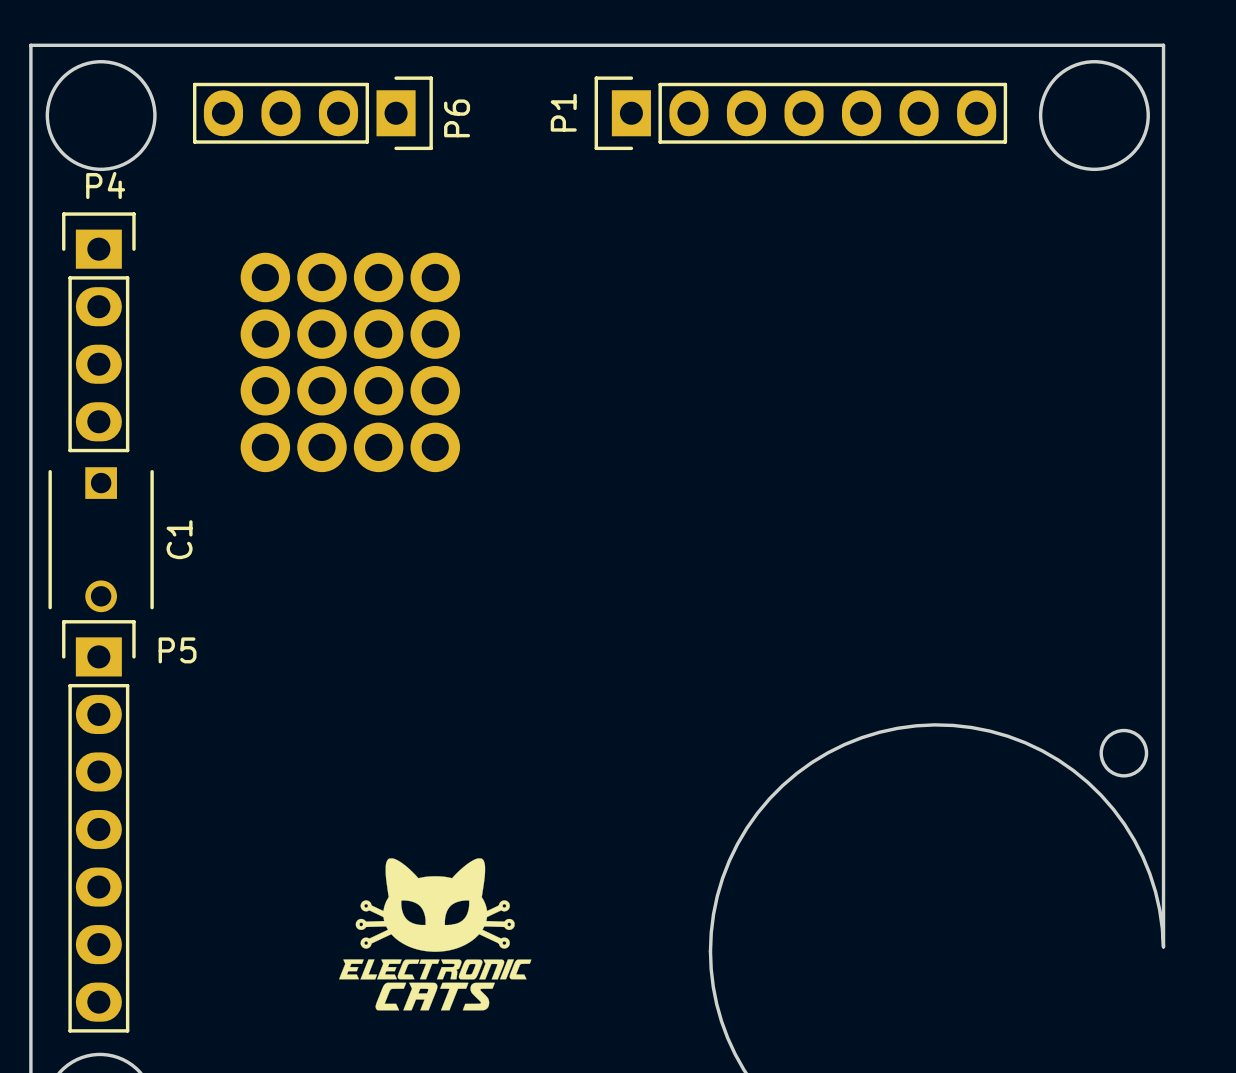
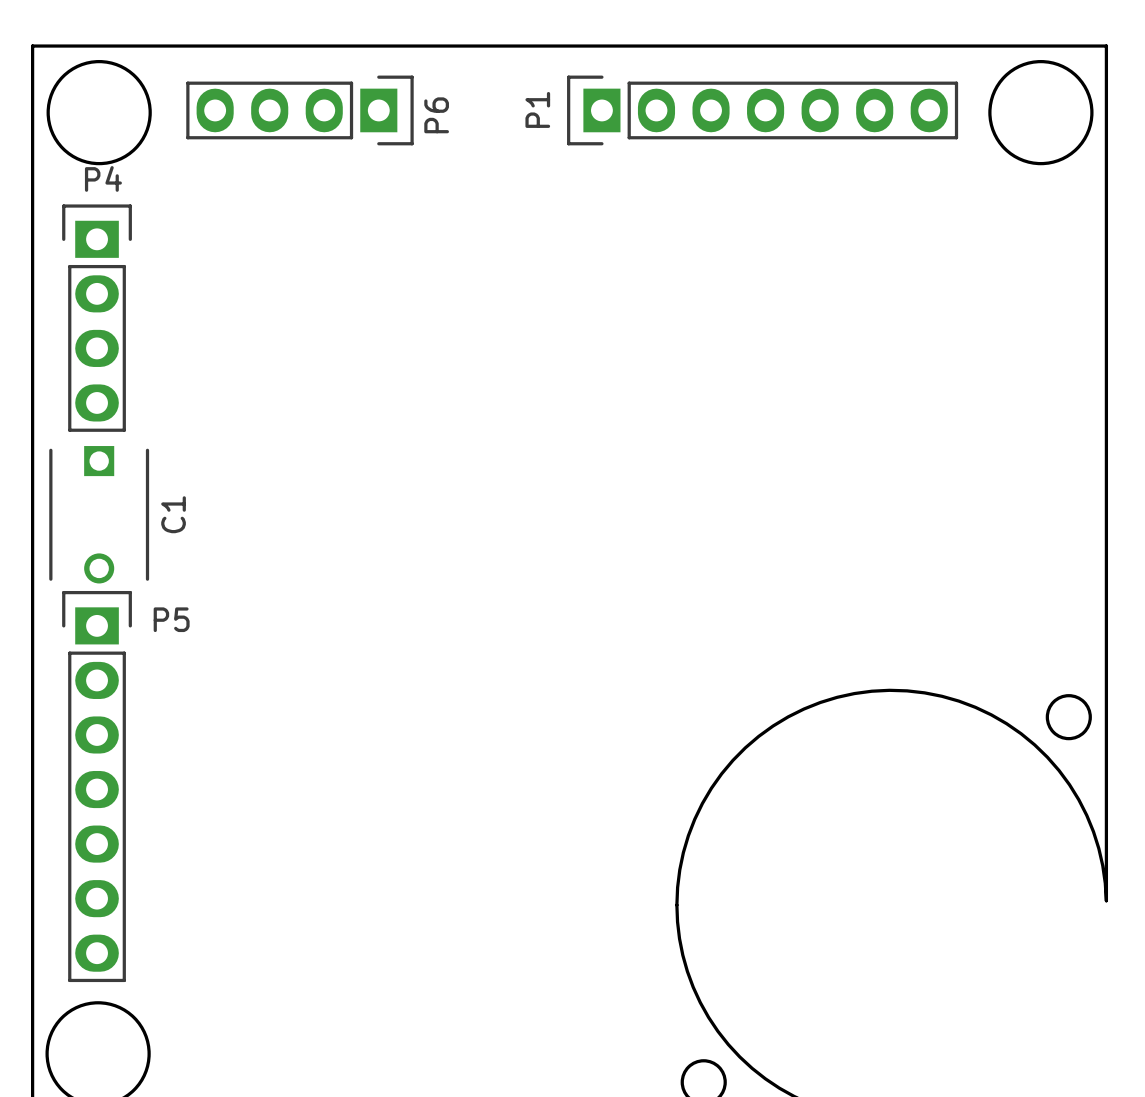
part: (265, 277) -> none
part: (321, 277) -> none
part: (378, 277) -> none
part: (435, 277) -> none
part: (265, 334) -> none
part: (321, 334) -> none
part: (378, 334) -> none
part: (435, 334) -> none
part: (265, 390) -> none
part: (321, 390) -> none
part: (378, 390) -> none
part: (435, 390) -> none
part: (265, 447) -> none
part: (321, 447) -> none
part: (378, 447) -> none
part: (435, 447) -> none
drawing: [339, 858, 532, 1011] -> none

